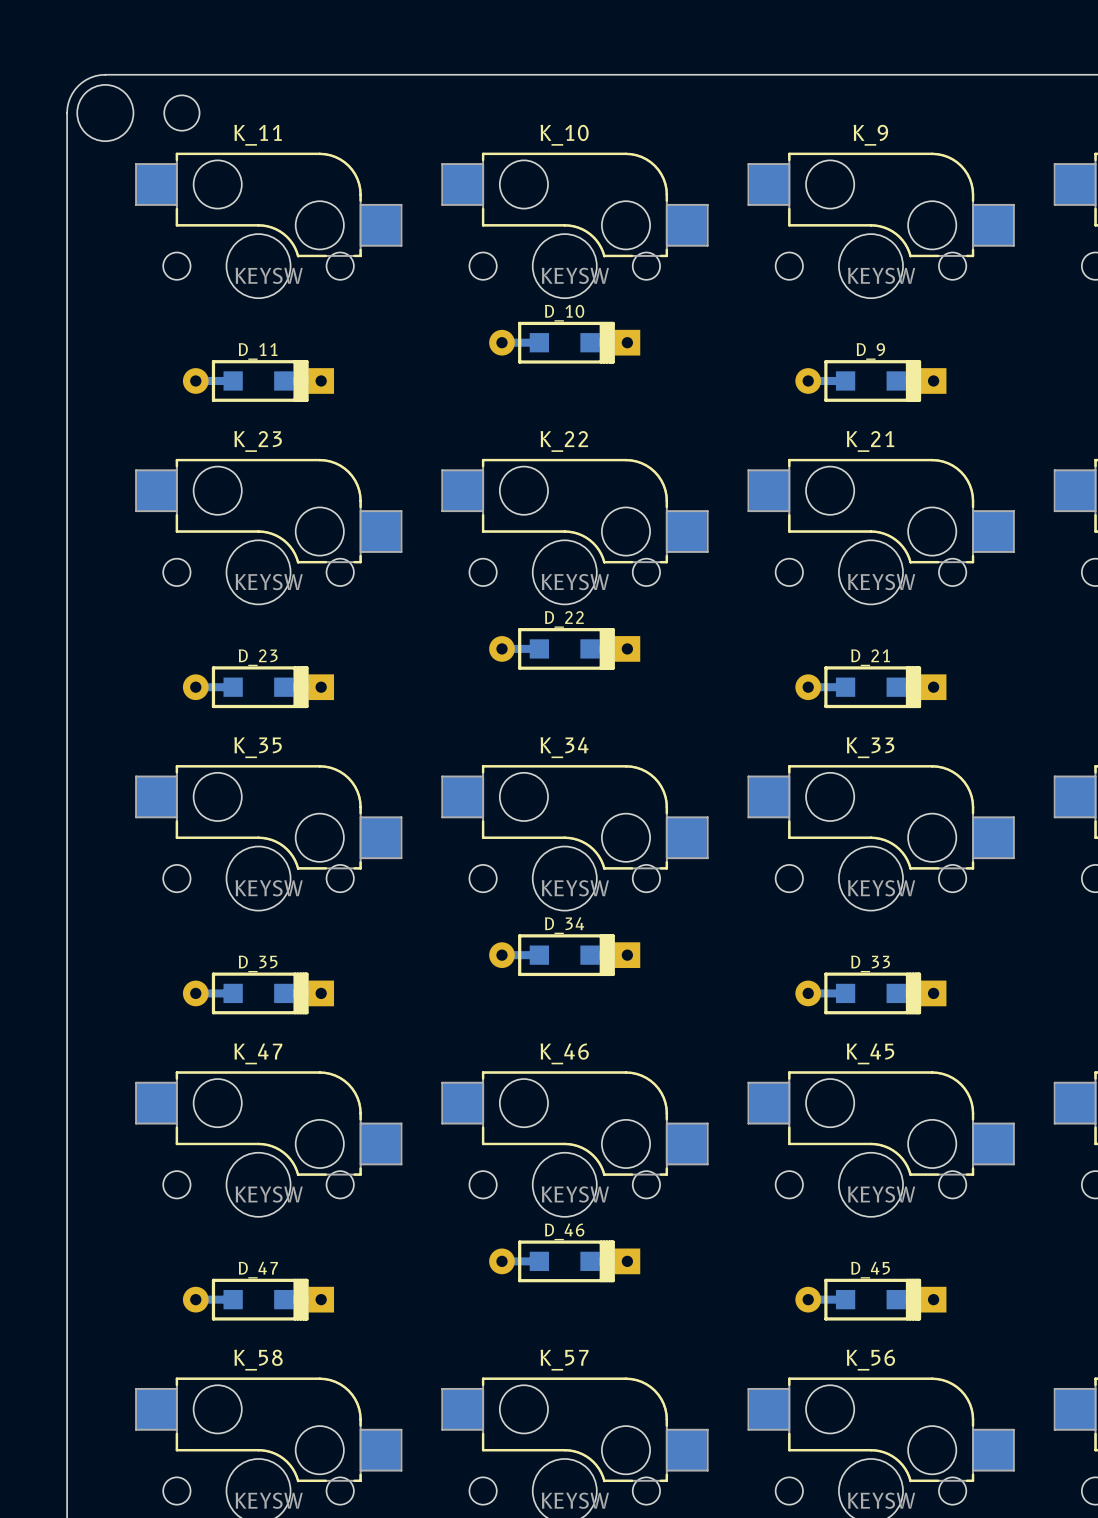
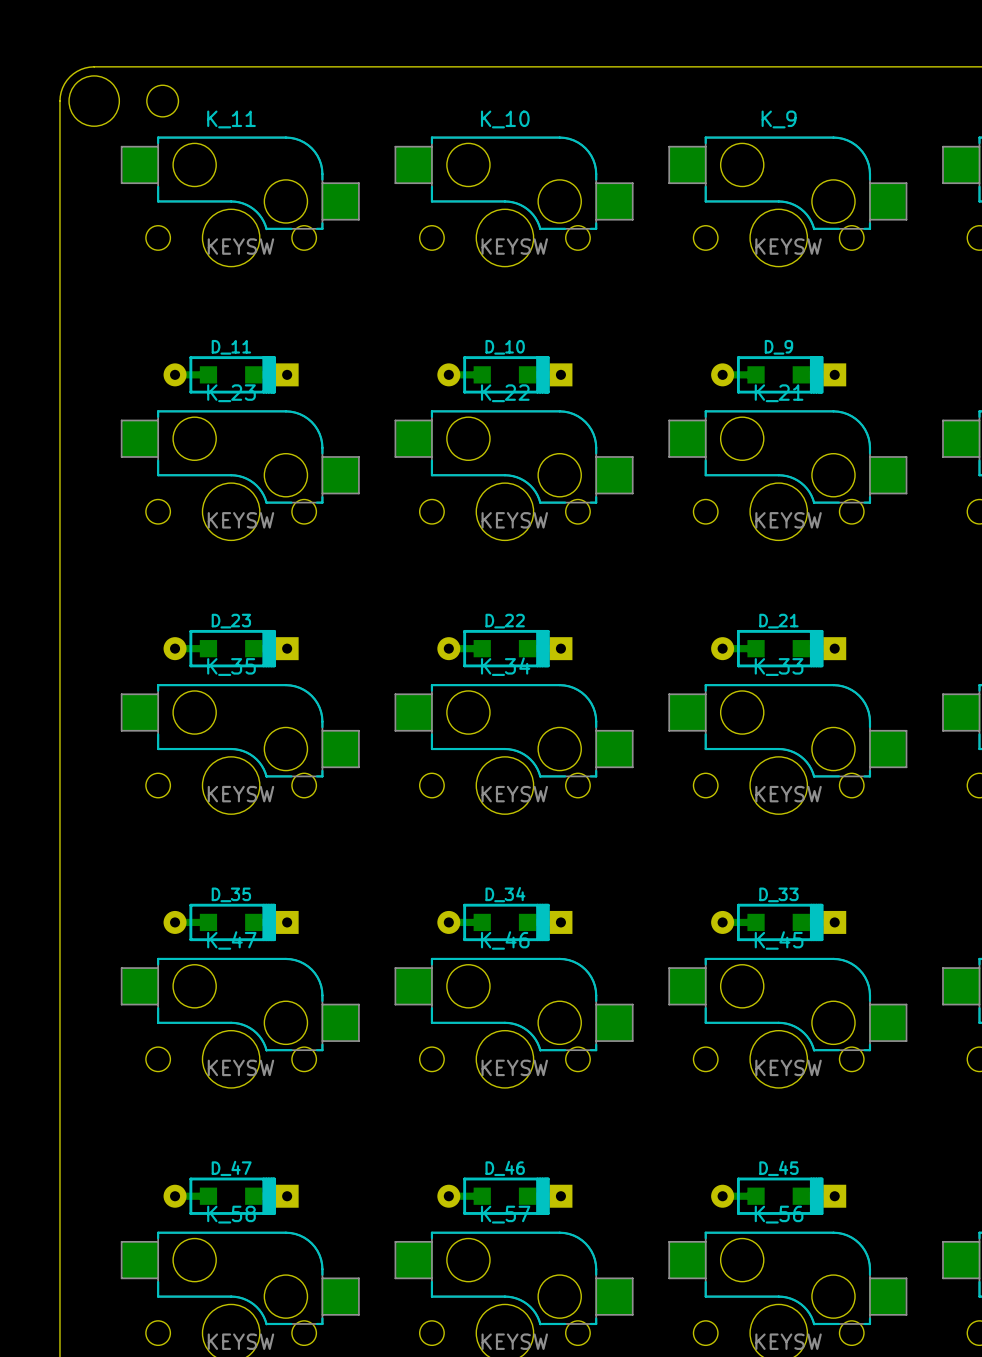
D_10 position: (564, 342) -> (504, 374)
D_11 position: (258, 380) -> (231, 374)
D_9 position: (870, 380) -> (778, 374)
D_22 position: (564, 648) -> (504, 648)
D_23 position: (258, 687) -> (231, 648)
D_21 position: (870, 687) -> (778, 648)
D_34 position: (564, 955) -> (504, 922)
D_35 position: (258, 993) -> (231, 922)
D_33 position: (870, 993) -> (778, 922)
D_46 position: (564, 1261) -> (504, 1196)
D_47 position: (258, 1299) -> (231, 1196)
D_45 position: (870, 1299) -> (778, 1196)

